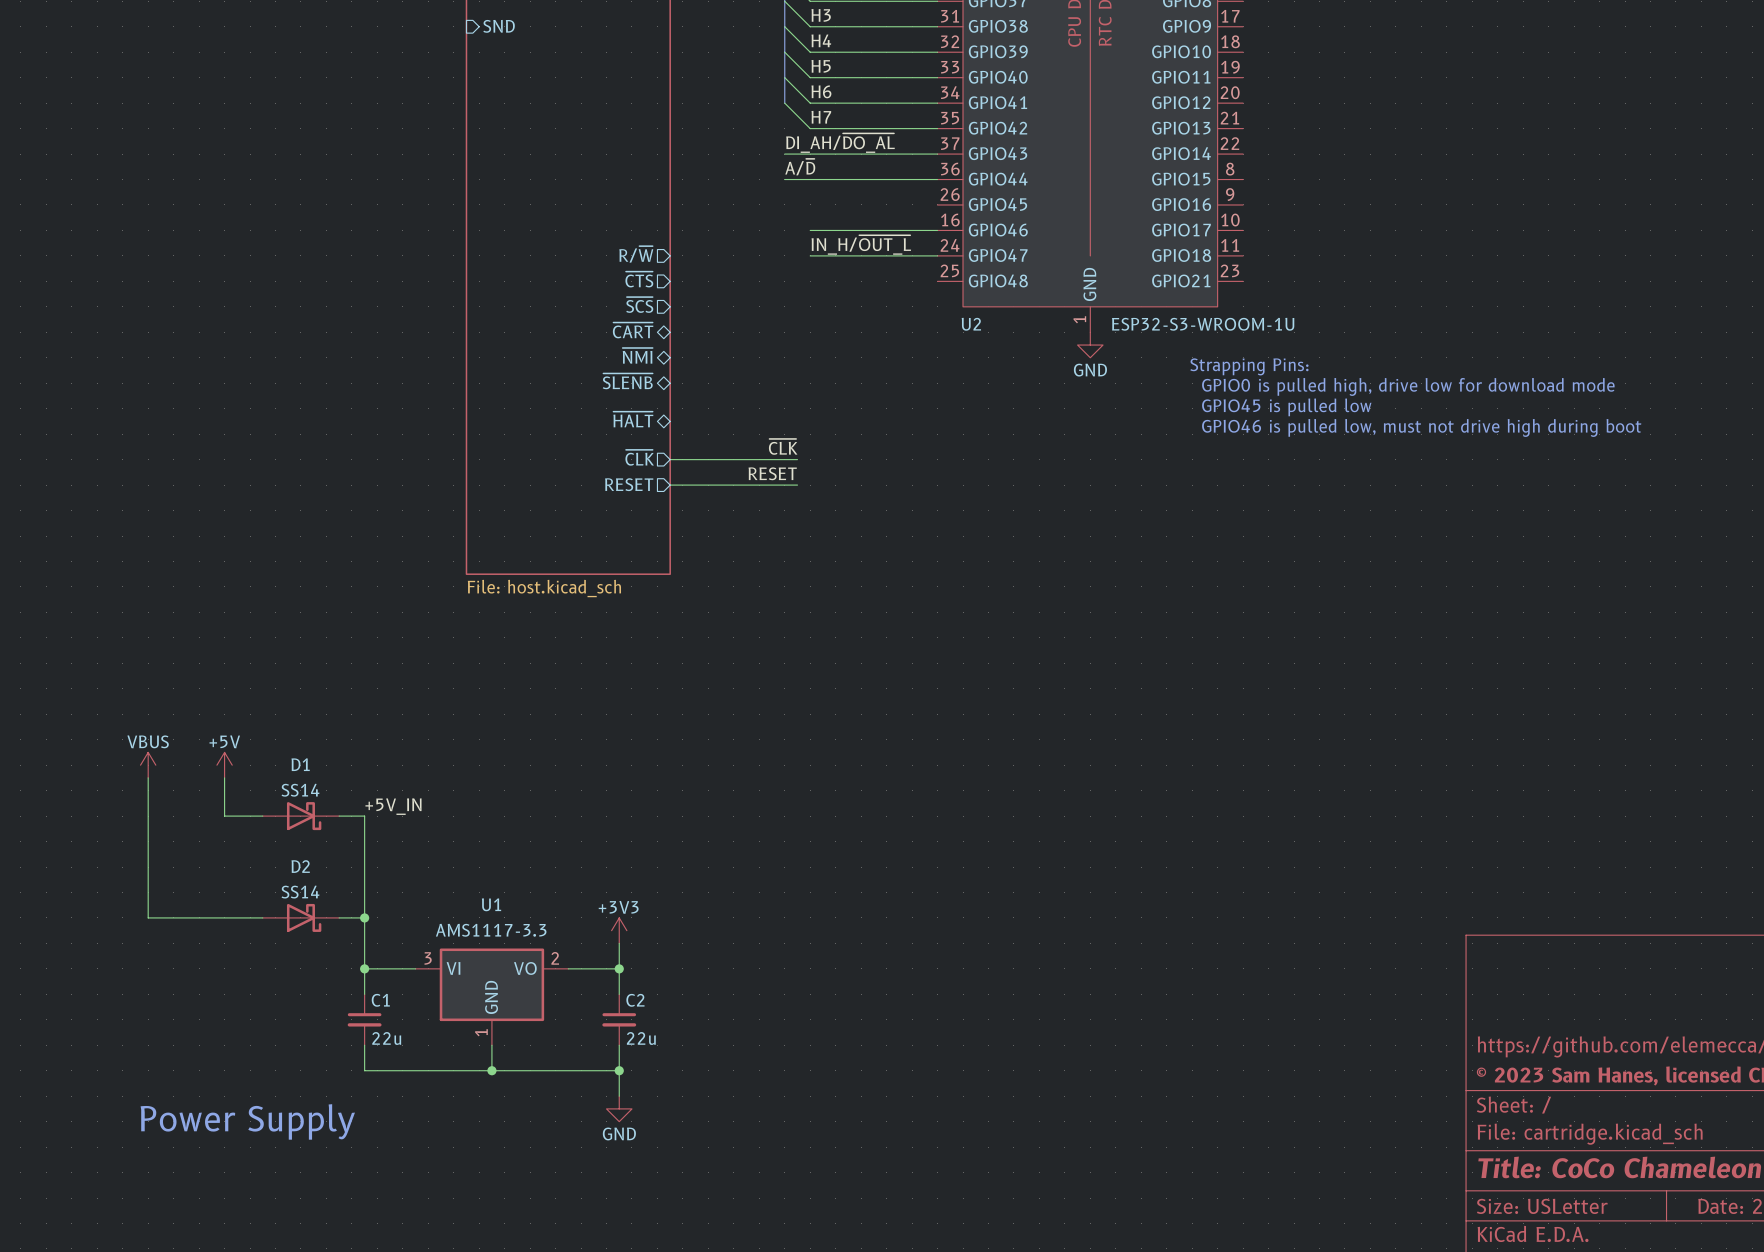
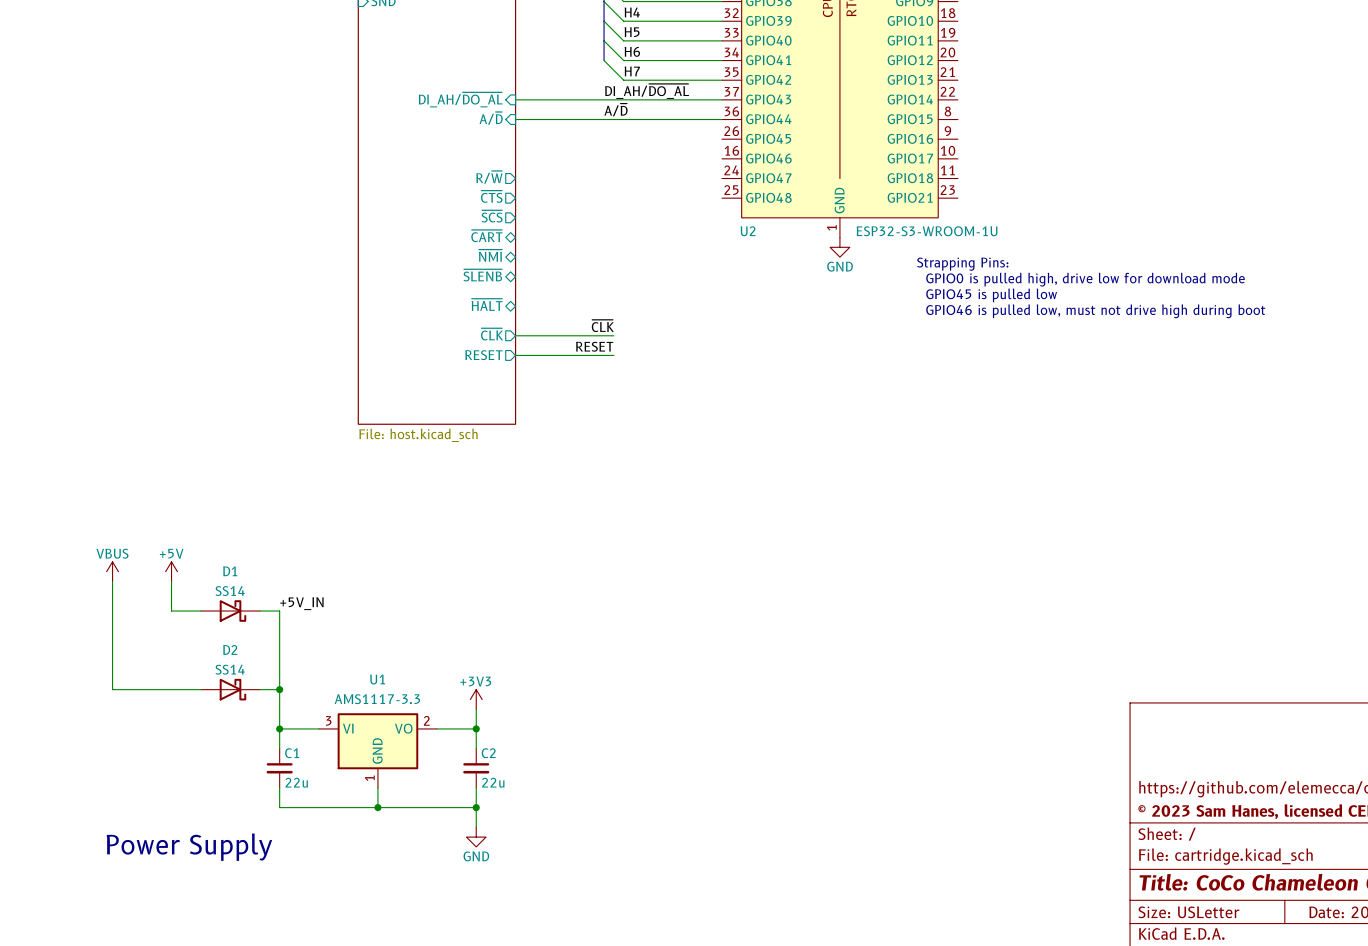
sheet pin: none -> DI_AH/~{DO_AL} (460, 99)
wire: none -> (515, 99) (604, 99)
sheet pin: none -> A/~{D} (491, 118)
wire: none -> (515, 119) (604, 119)
wire: (810, 230) (937, 230) -> none
label: IN_H/~{OUT_L} (861, 244) -> none
wire: (810, 255) (937, 255) -> none

